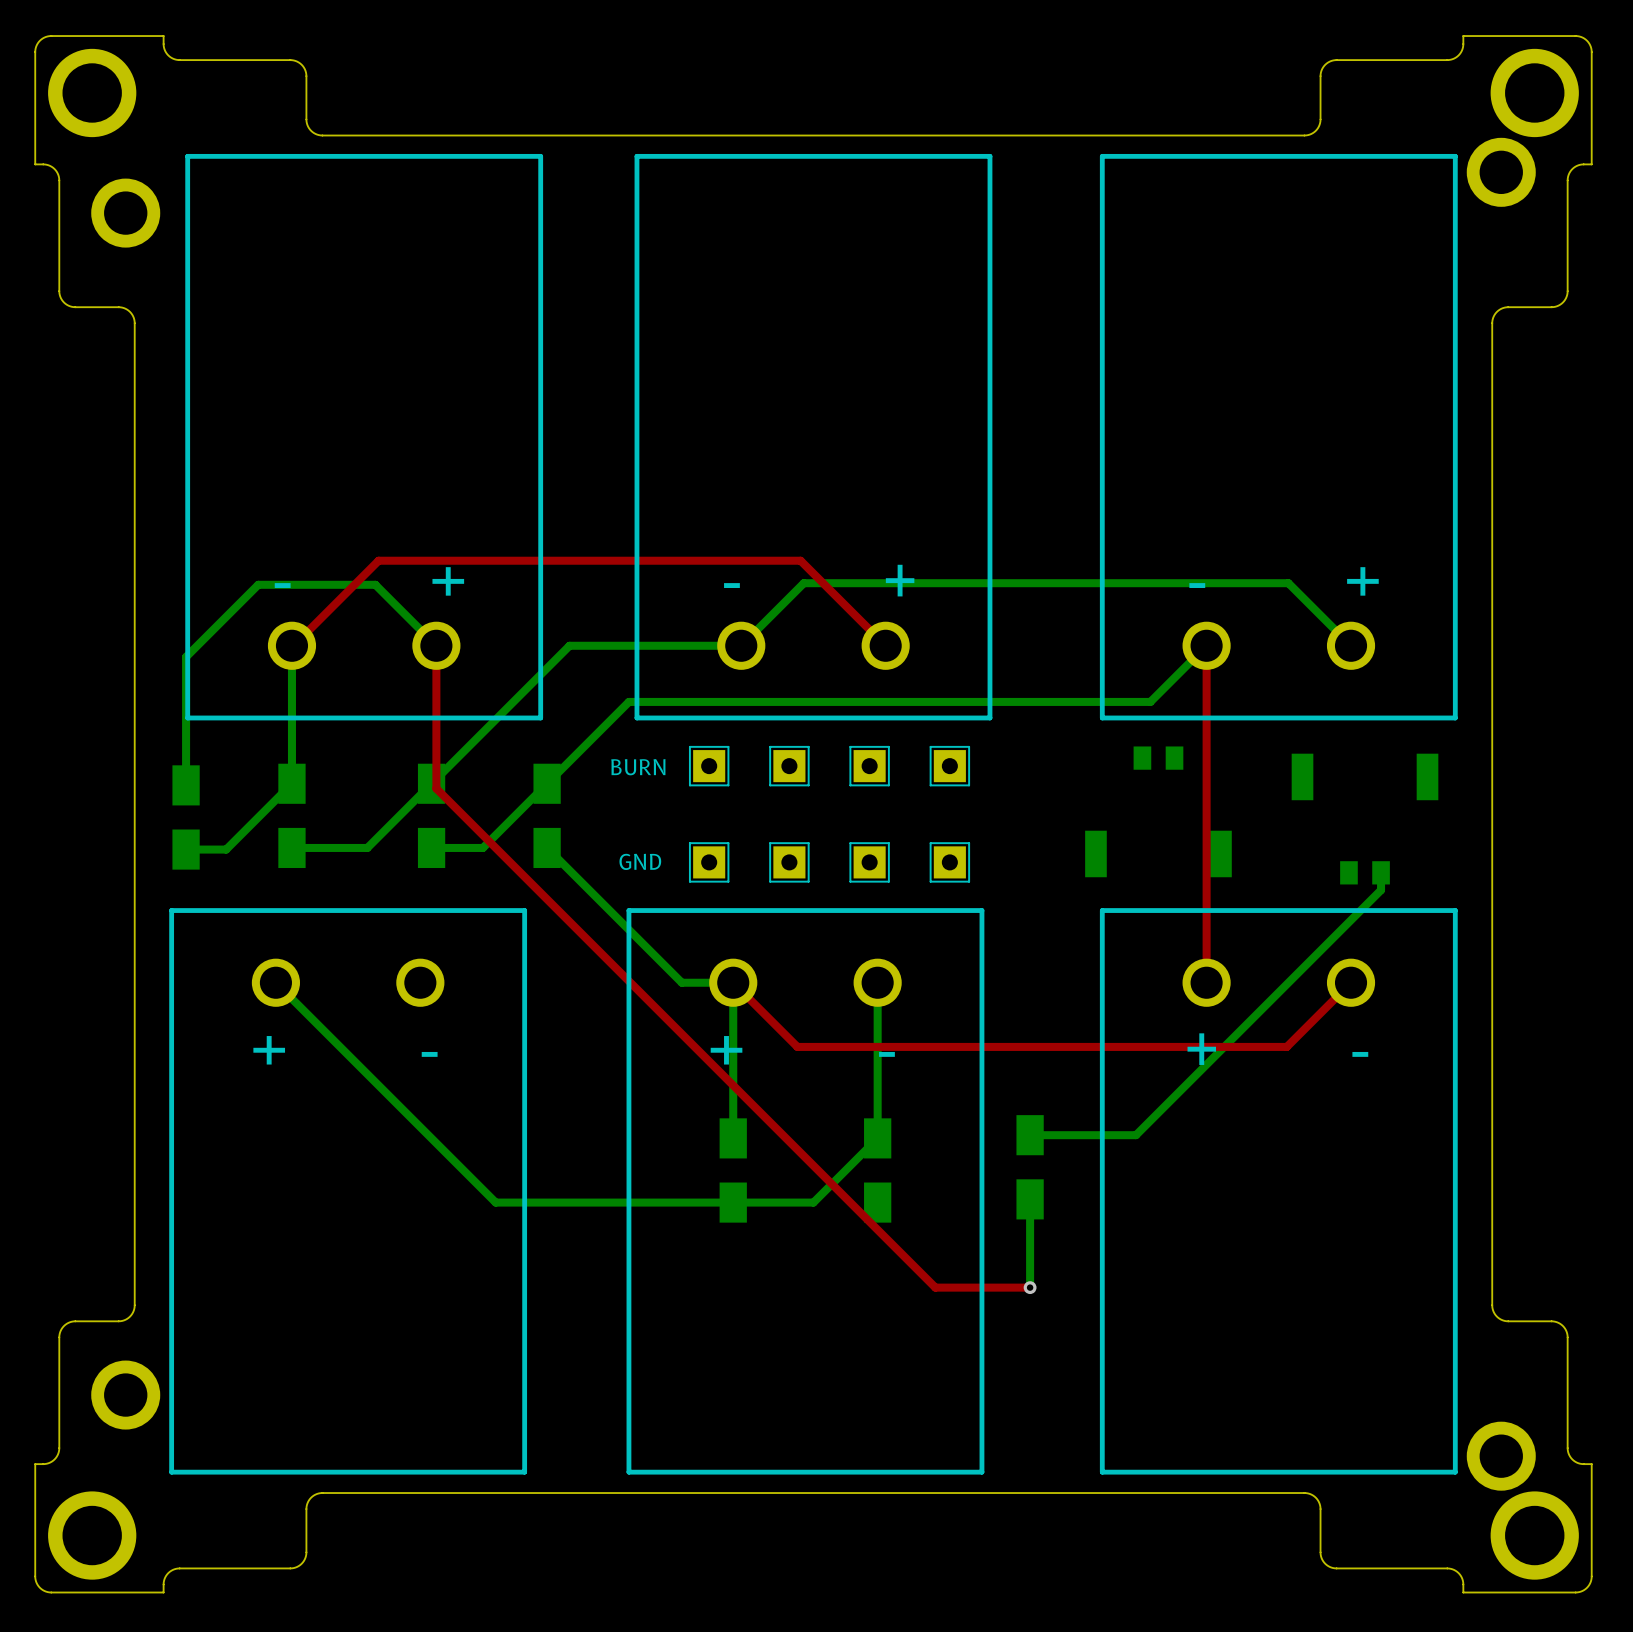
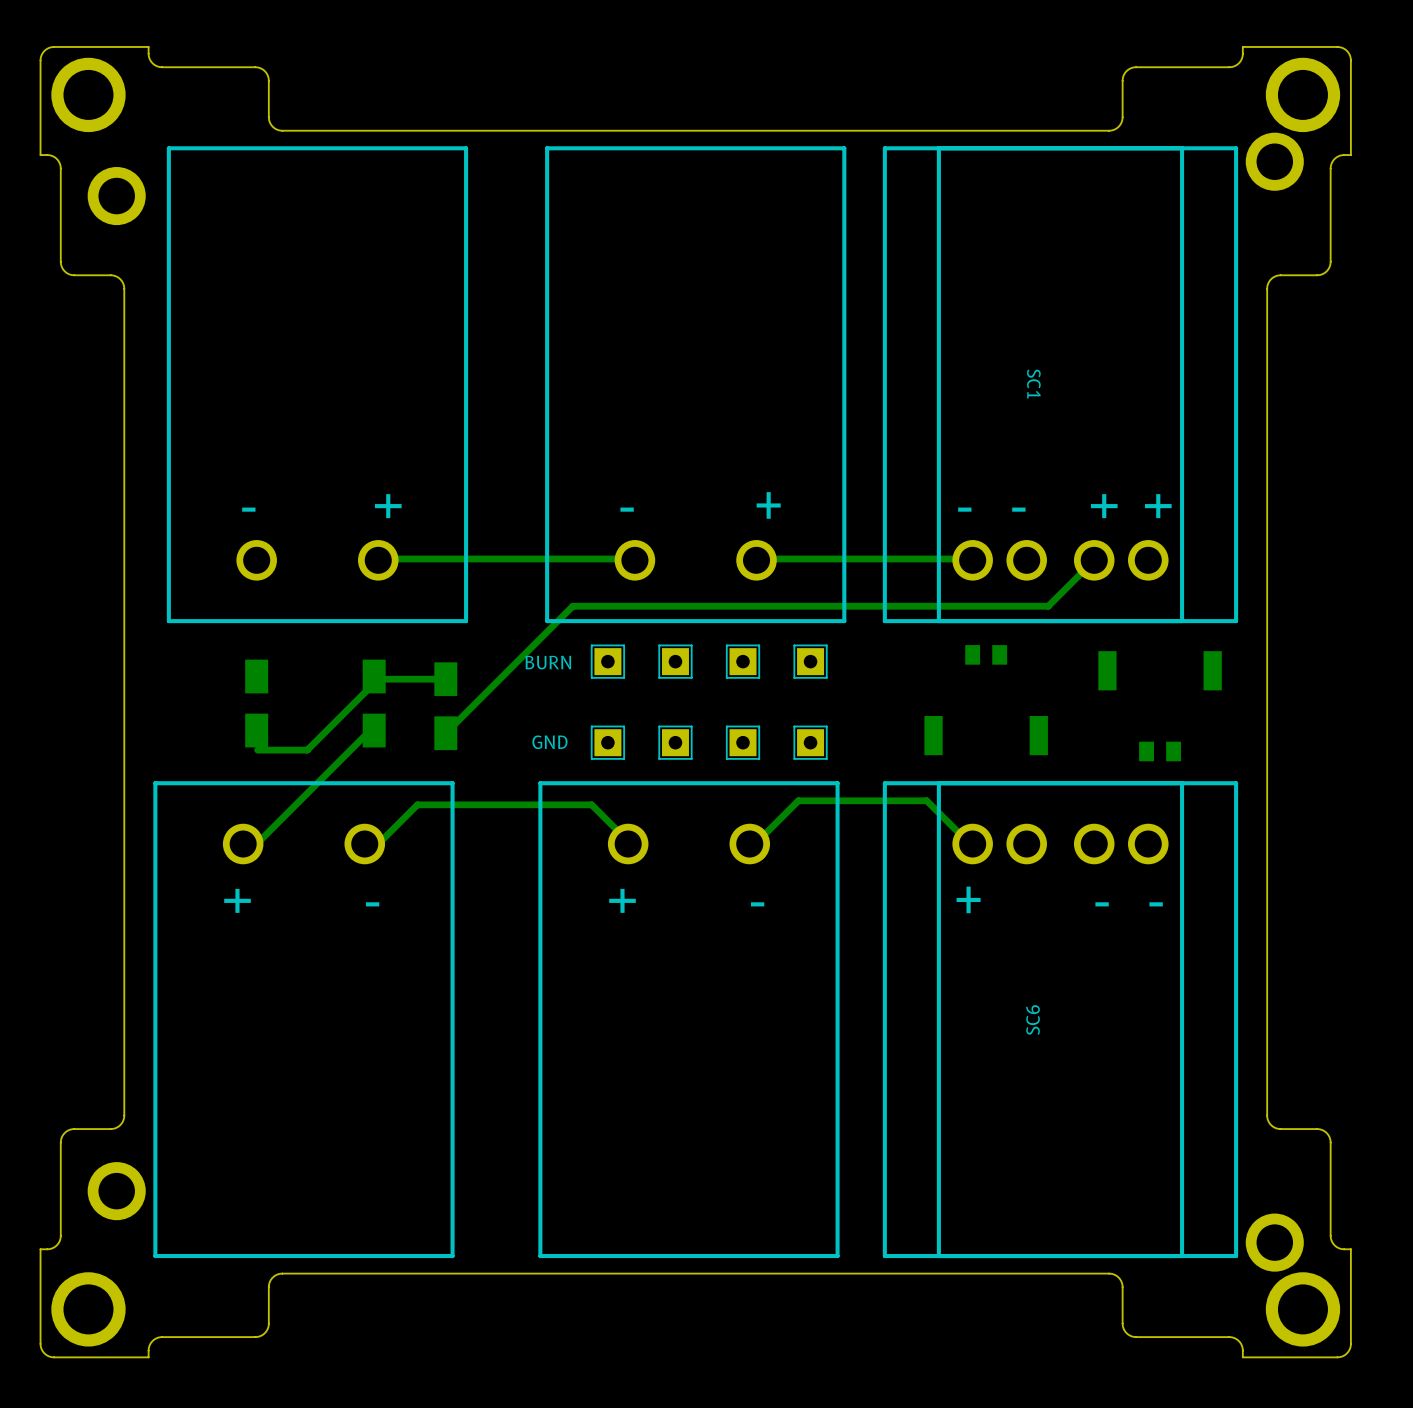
SC1: none -> (1033, 384)
bottom track: none -> (760, 557) (969, 557) (972, 560)
top track: (291, 645) (378, 560) (800, 560) (885, 645) -> none
bottom track: (291, 645) (291, 783) (226, 849) (186, 849) -> none
top track: (436, 645) (436, 788) (935, 1287) (1030, 1287) -> none
bottom track: (436, 645) (375, 584) (258, 584) (186, 657) (186, 785) -> (378, 560) (638, 557)
top track: (1206, 645) (1206, 982) -> none
bottom track: (1206, 645) (1150, 701) (628, 701) (482, 847) (431, 847) -> none
bottom track: none -> (1094, 560) (1048, 606) (572, 606) (445, 733)
bottom track: (1351, 645) (1288, 583) (803, 583) (741, 645) (569, 645) (367, 847) (291, 847) -> none
bottom track: none -> (445, 679) (378, 679) (307, 750) (257, 750)
part position: (547, 815) -> (445, 706)
part: (186, 817) -> none
bottom track: (547, 847) (681, 982) (733, 982) (733, 1138) -> none
bottom track: none -> (378, 733) (367, 733) (256, 844)
bottom track: (1381, 872) (1381, 890) (1136, 1135) (1030, 1135) -> none
bottom track: (275, 982) (495, 1202) (813, 1202) (877, 1138) (877, 982) -> none
bottom track: none -> (378, 844) (417, 804) (591, 804) (632, 845) (630, 846)
top track: (733, 982) (797, 1046) (1286, 1046) (1351, 982) -> none
bottom track: none -> (972, 844) (971, 845) (926, 800) (798, 800) (753, 845)
text position: + (1201, 1049) -> + (968, 899)
part: (1030, 1167) -> none
part: (733, 1170) -> none
part: (877, 1170) -> none
SC6: none -> (1033, 1019)
bottom track: (1030, 1199) (1030, 1287) -> none
via: (1030, 1287) -> none

